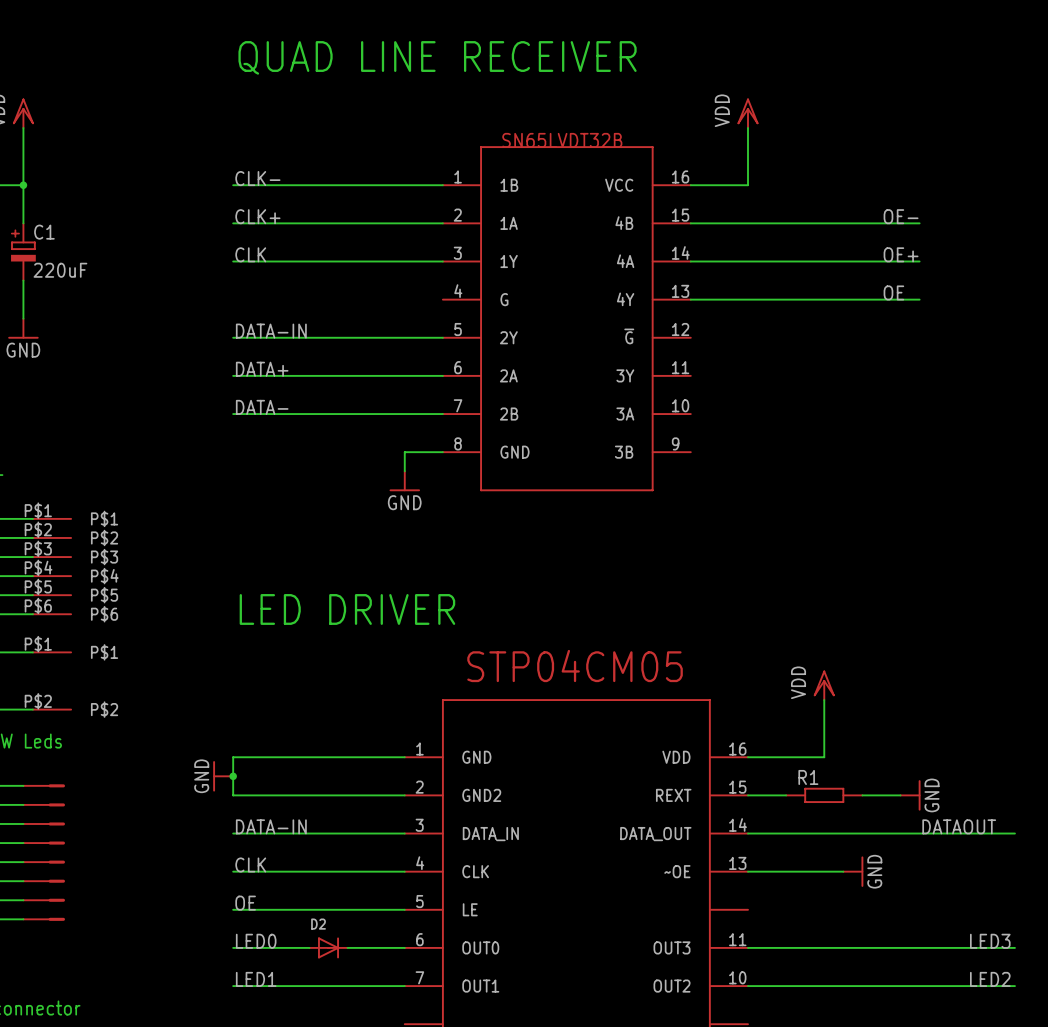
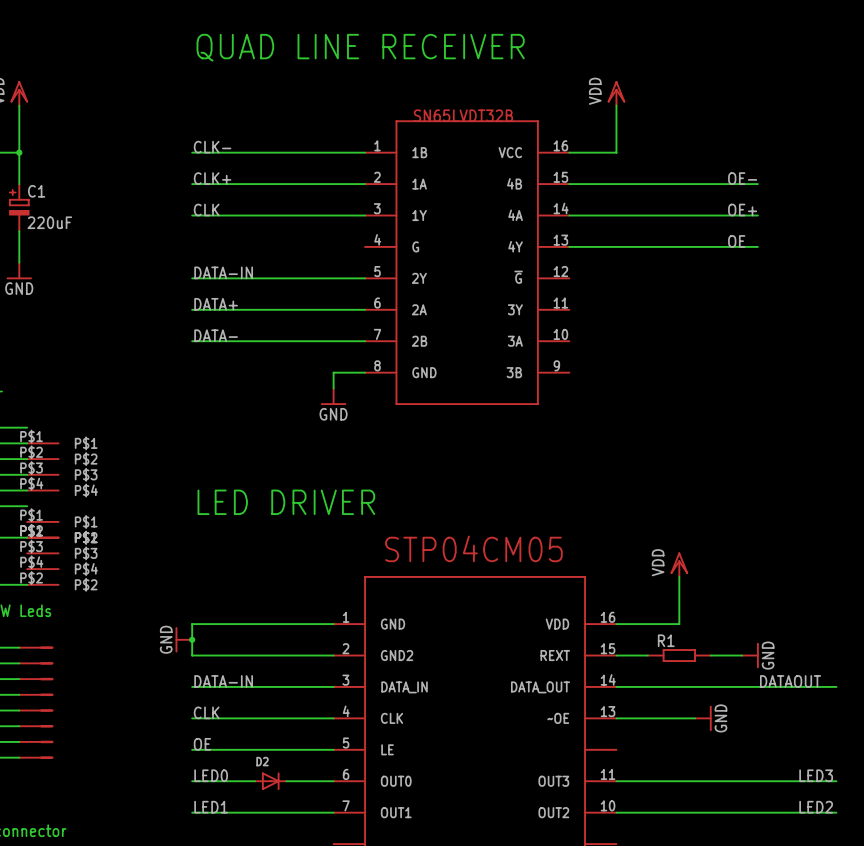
part symbol: [32, 518, 72, 615] -> [27, 443, 59, 491]
part: none -> (42, 545)

